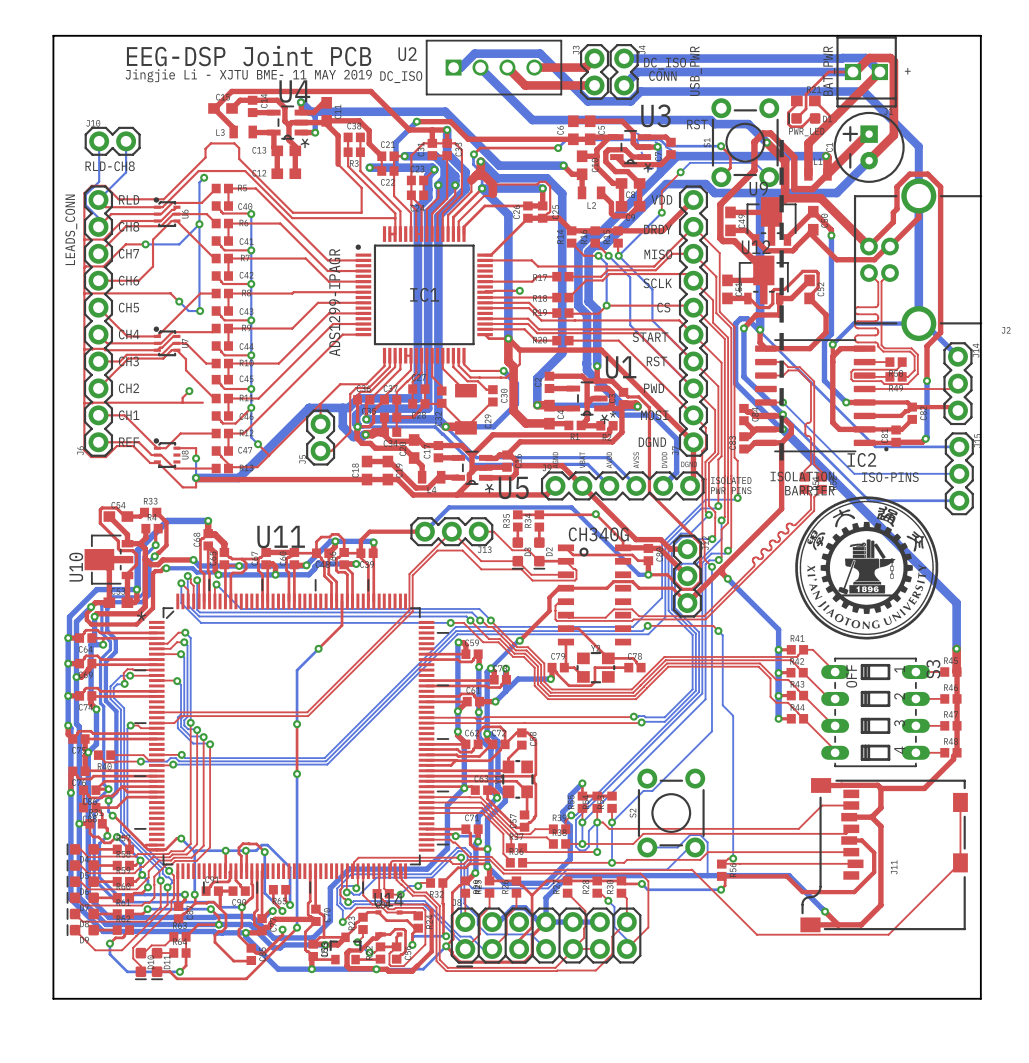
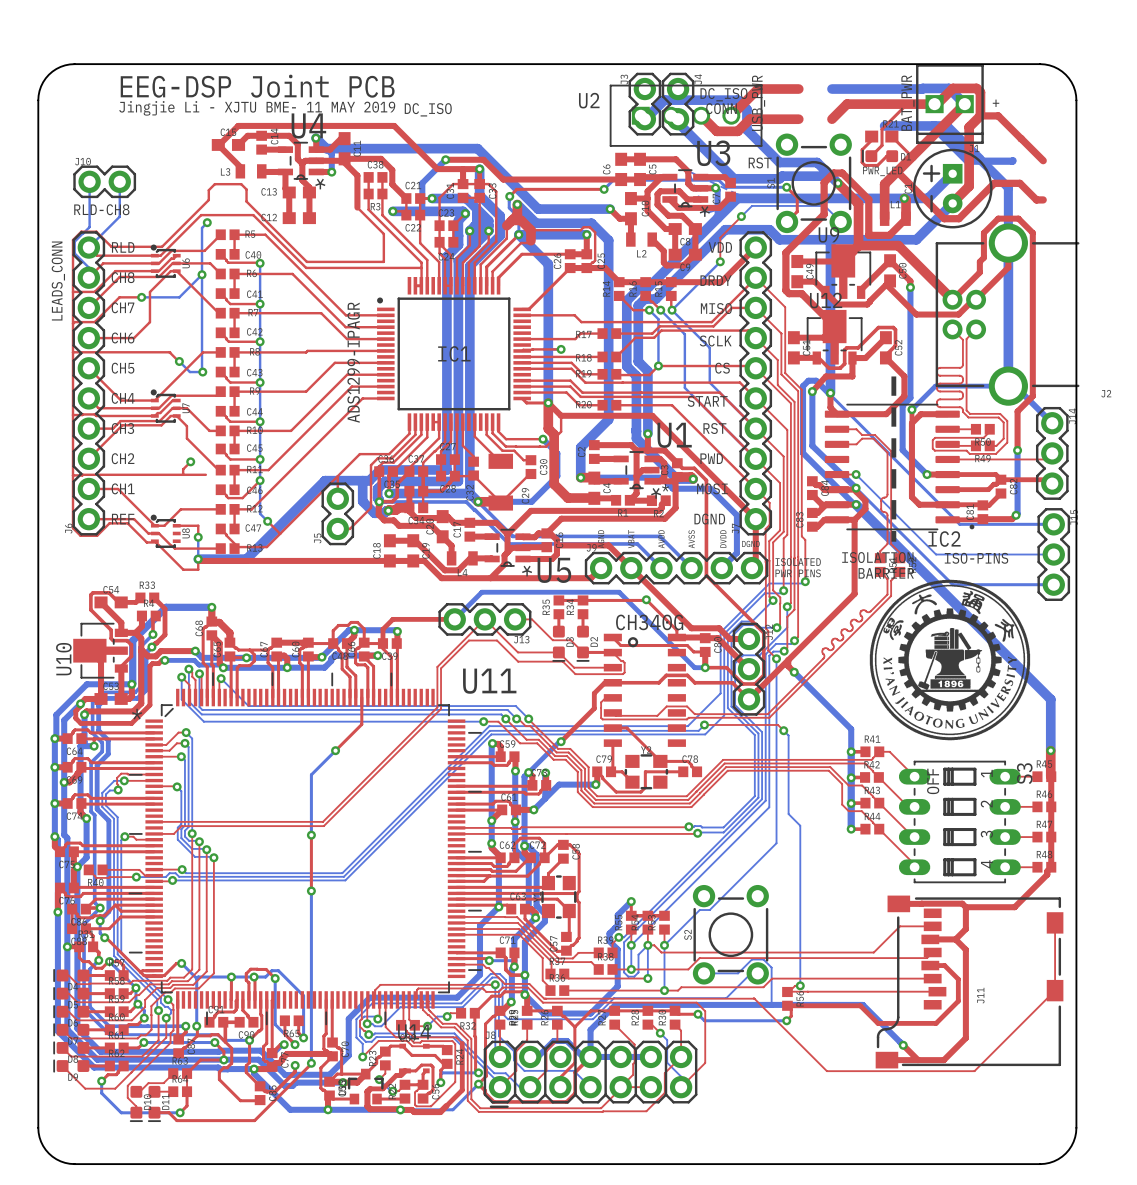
top track: (594, 58) (585, 67) (534, 67) -> none
bottom track: (624, 58) (761, 58) -> none
top track: none -> (798, 89) (758, 89) (731, 115)
bottom track: (453, 67) (460, 67) (474, 53) (540, 53) (587, 101) (630, 101) (640, 91) (808, 91) -> none
bottom track: (480, 67) (532, 120) (710, 120) -> (640, 115) (648, 115) (664, 100) (737, 100) (746, 109) (746, 129) (775, 157)
U2 position: (493, 67) -> (686, 115)
top track: (507, 67) (525, 85) (594, 85) -> none
board edge: (53, 68) (53, 35) (980, 35) (980, 998) (53, 998) (53, 985) -> (38, 100) (41, 86) (48, 74) (60, 66) (74, 64) (1040, 64) (1054, 66) (1065, 74) (1073, 86) (1076, 100) (1076, 1127) (1073, 1141) (1065, 1153) (1054, 1161) (1040, 1164) (74, 1164) (60, 1161) (48, 1153) (41, 1141) (38, 1127)
top track: none -> (933, 104) (847, 104) (831, 119)
bottom track: (852, 72) (637, 72) (624, 85) -> none
bottom track: none -> (670, 115) (734, 178) (830, 176)
top track: none -> (701, 115) (716, 131) (737, 131) (749, 119) (798, 119)
top track: (893, 82) (893, 135) (883, 145) -> (1021, 138) (998, 115) (980, 115) (969, 127) (969, 186)
bottom track: none -> (933, 125) (969, 161) (1013, 160)
top track: none -> (1021, 138) (1043, 160)
top track: none -> (897, 171) (944, 218) (959, 218) (994, 183) (1019, 183) (1036, 199) (1043, 199)
top track: (869, 134) (827, 174) -> none
bottom track: none -> (952, 173) (928, 198) (904, 198)
line: (781, 139) (781, 466) -> none
line: none -> (893, 376) (893, 541)
U11 name position: U11 (281, 537) -> U11 (489, 681)

